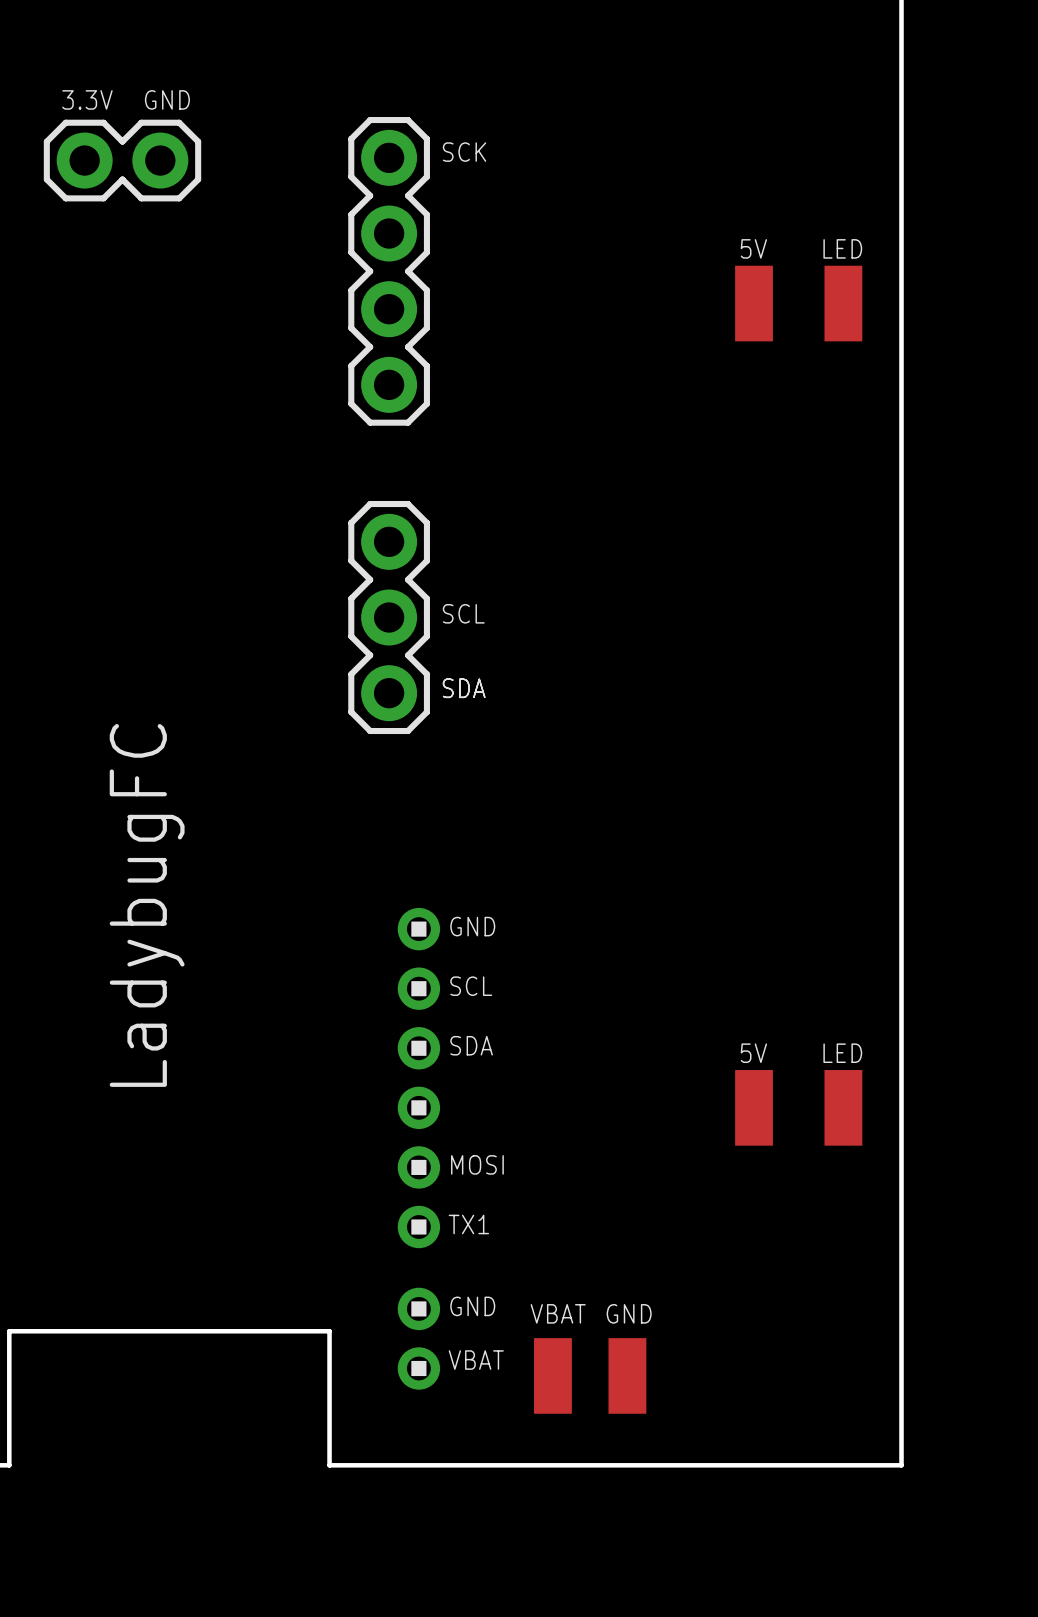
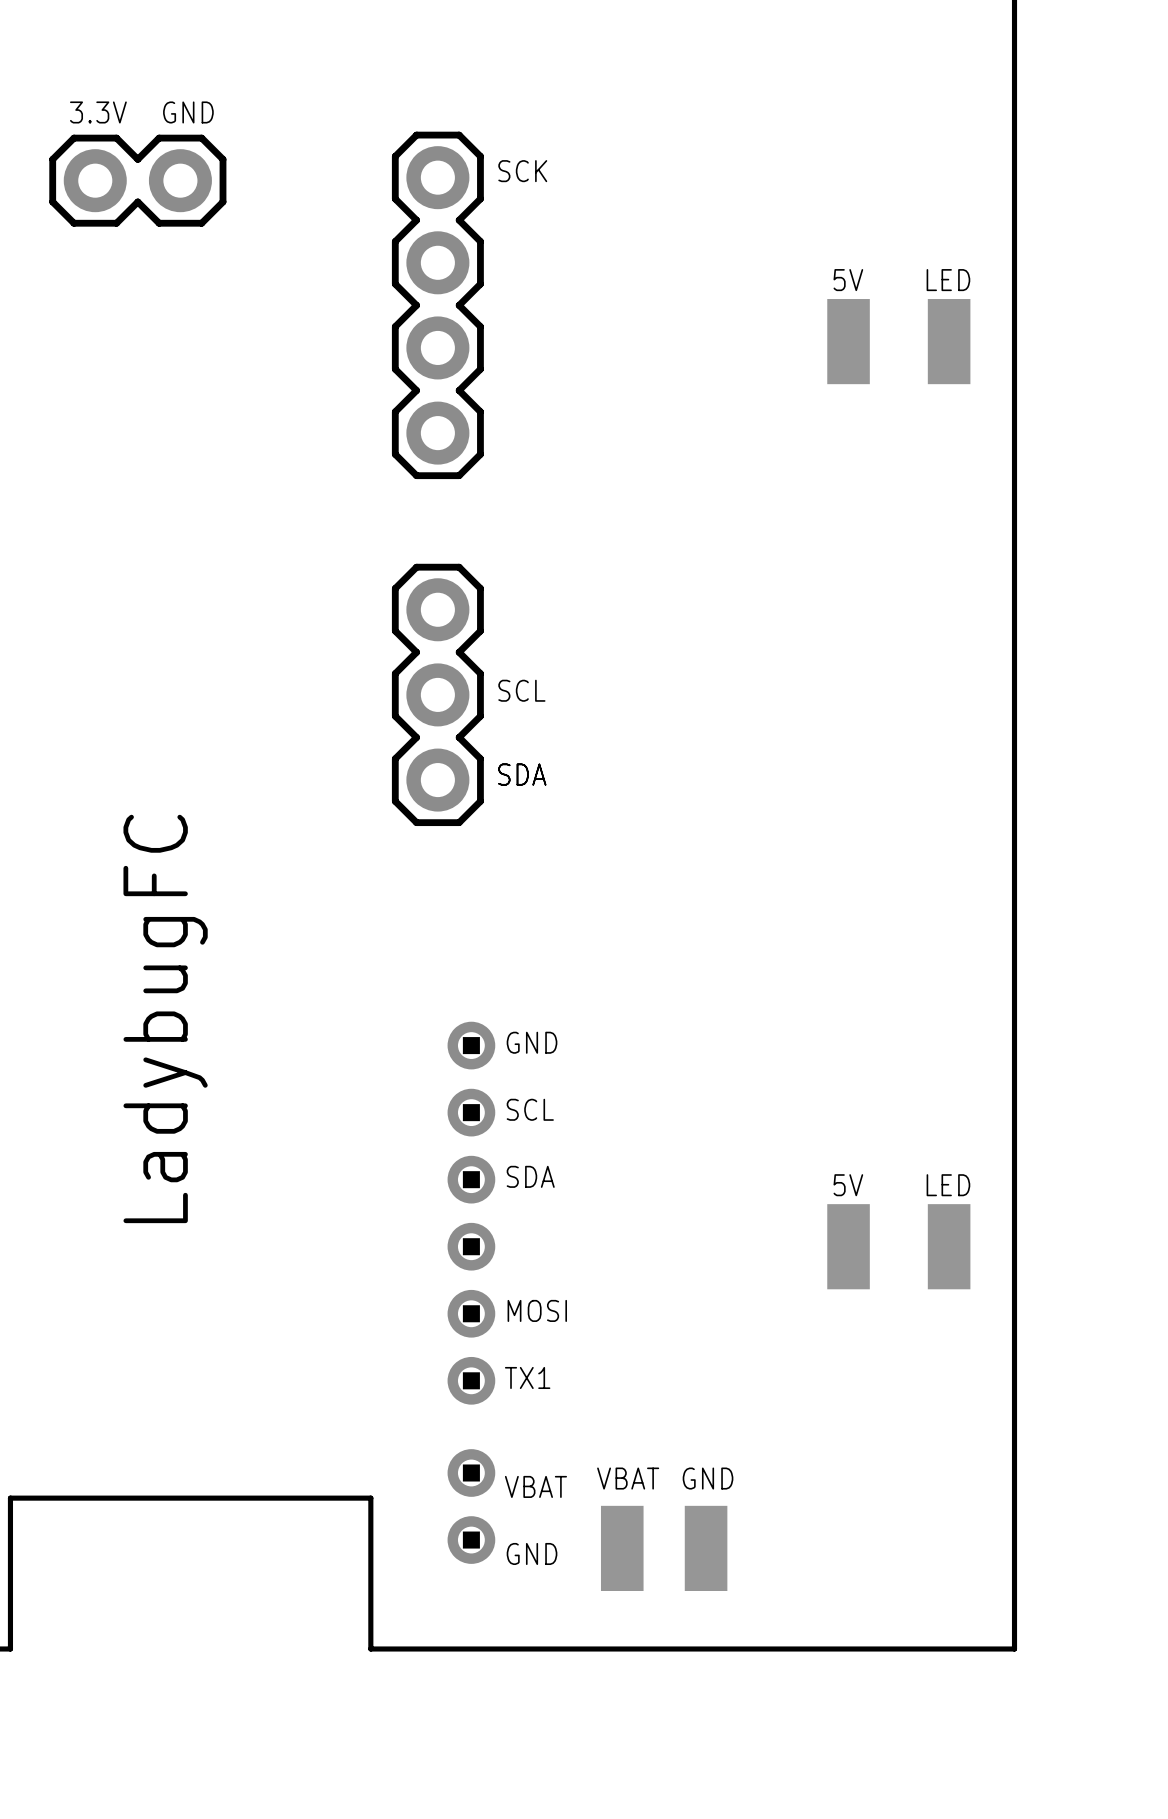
text: GND (472, 1306) -> VBAT (535, 1486)
text: VBAT (476, 1360) -> none
text: none -> GND (532, 1553)

